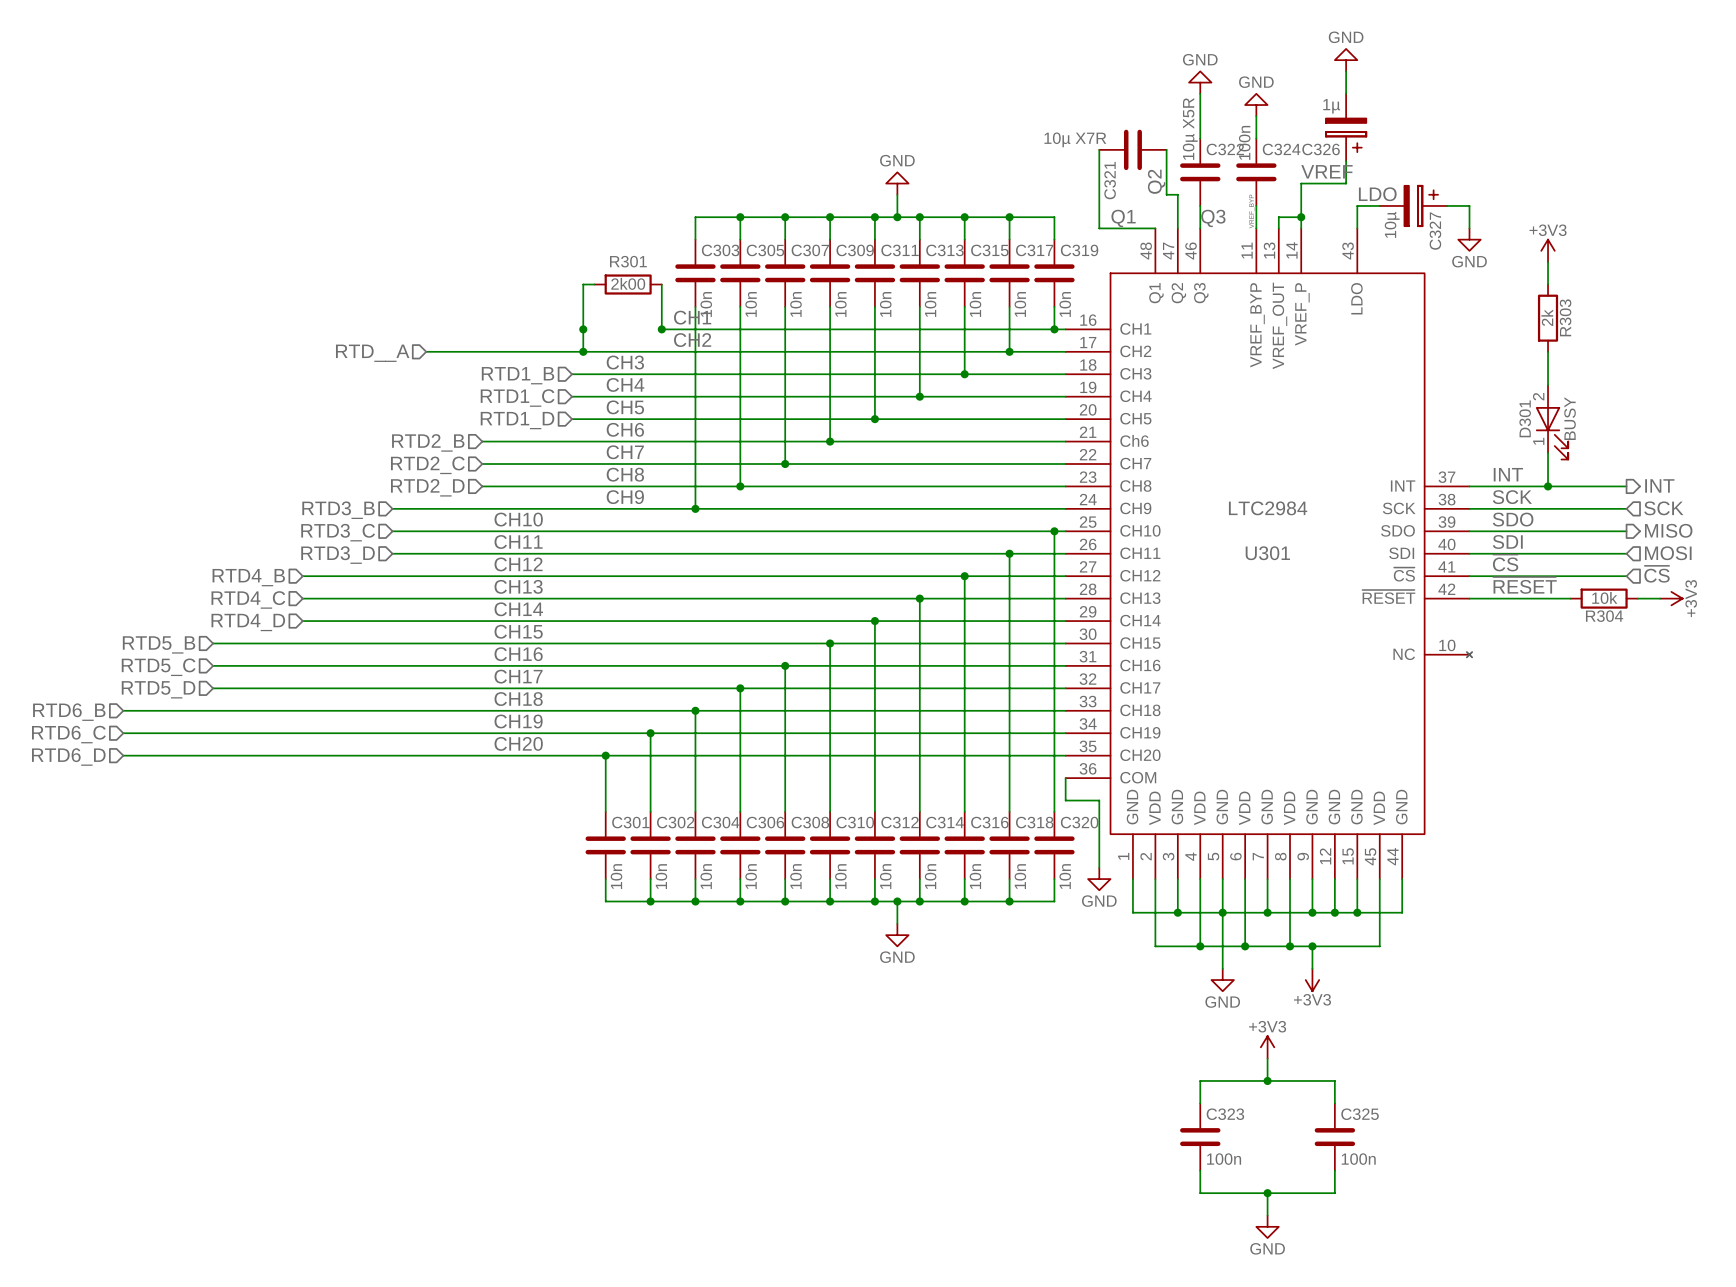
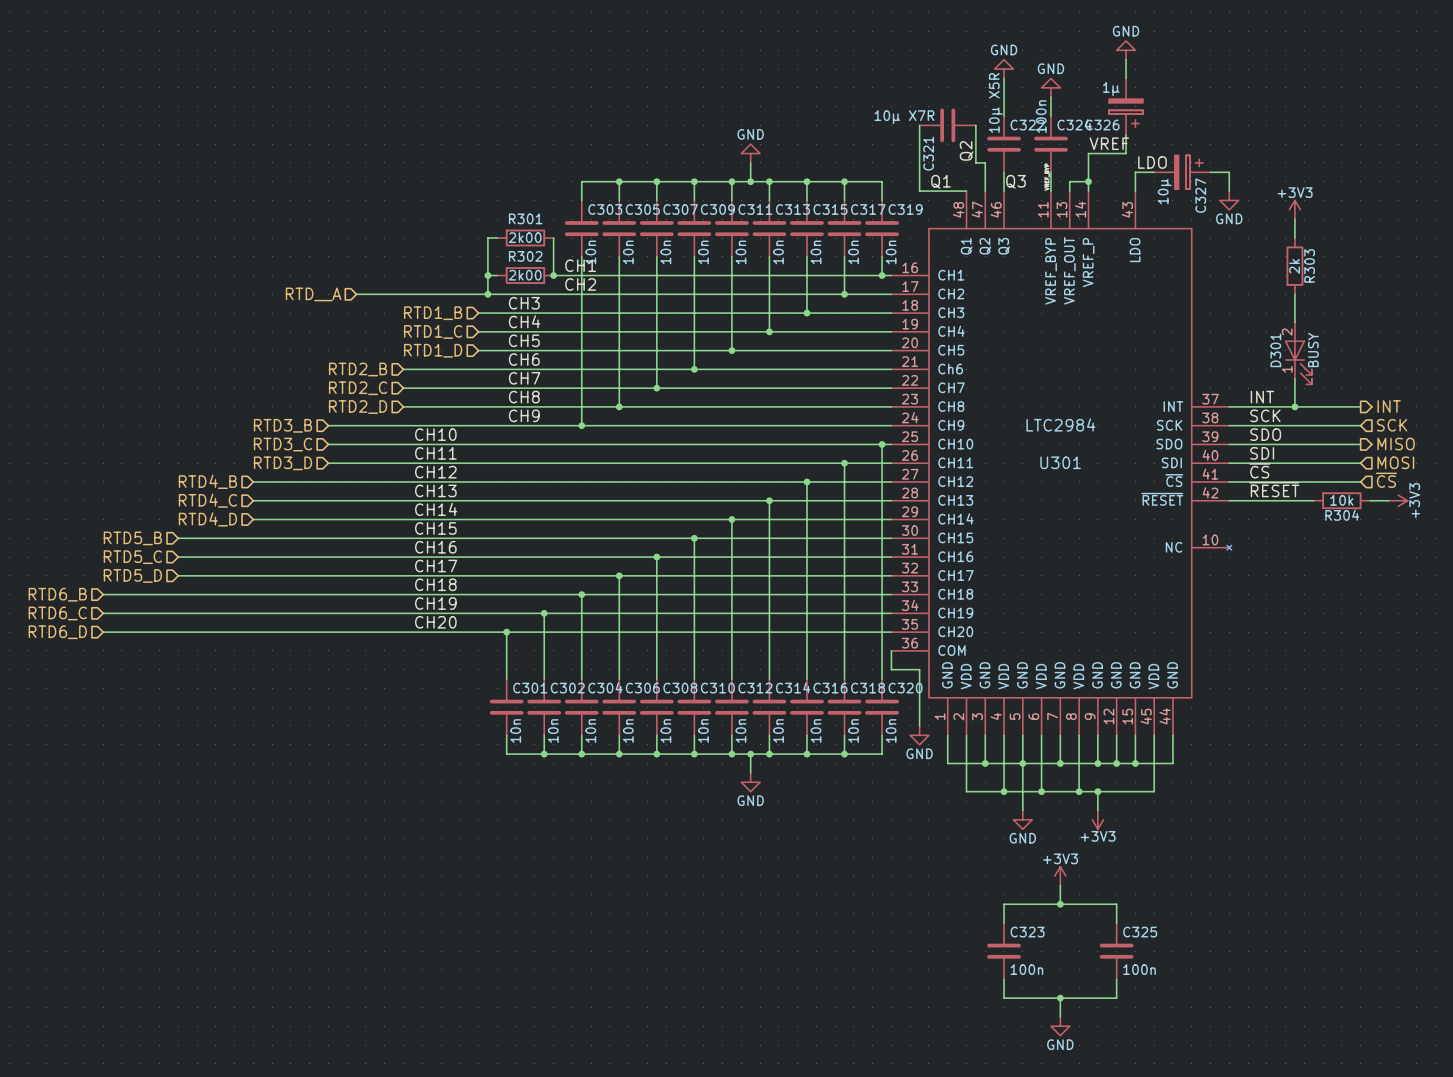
wire: none -> (487, 275) (497, 275)
R302: none -> 2k00 (525, 275)

